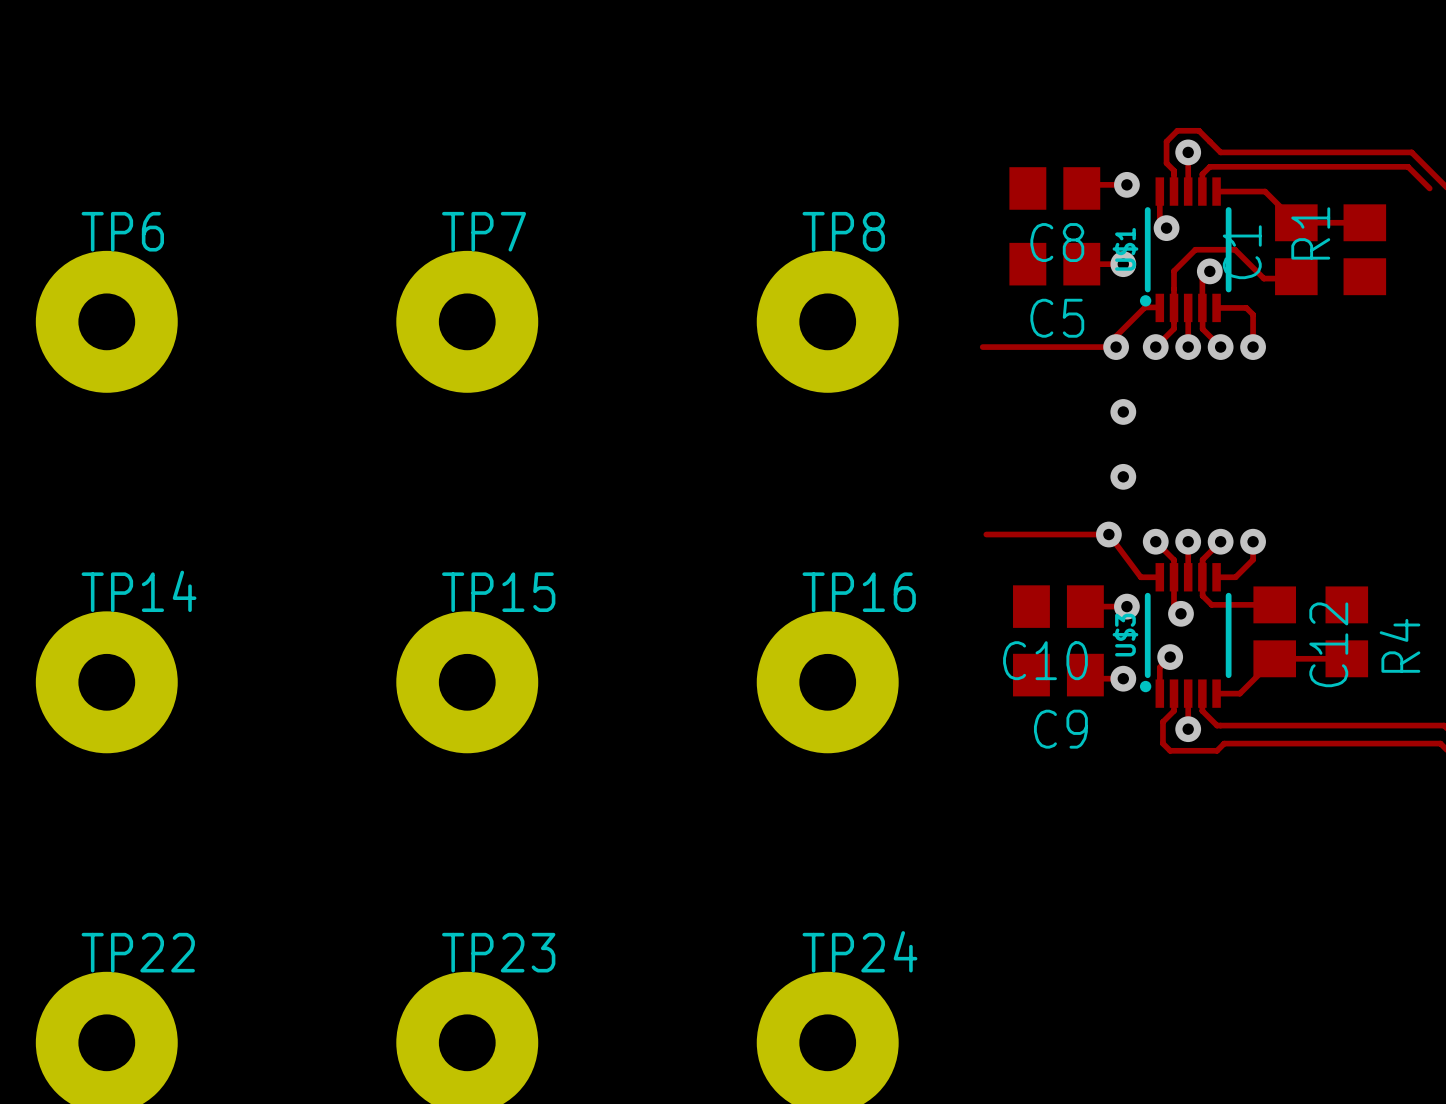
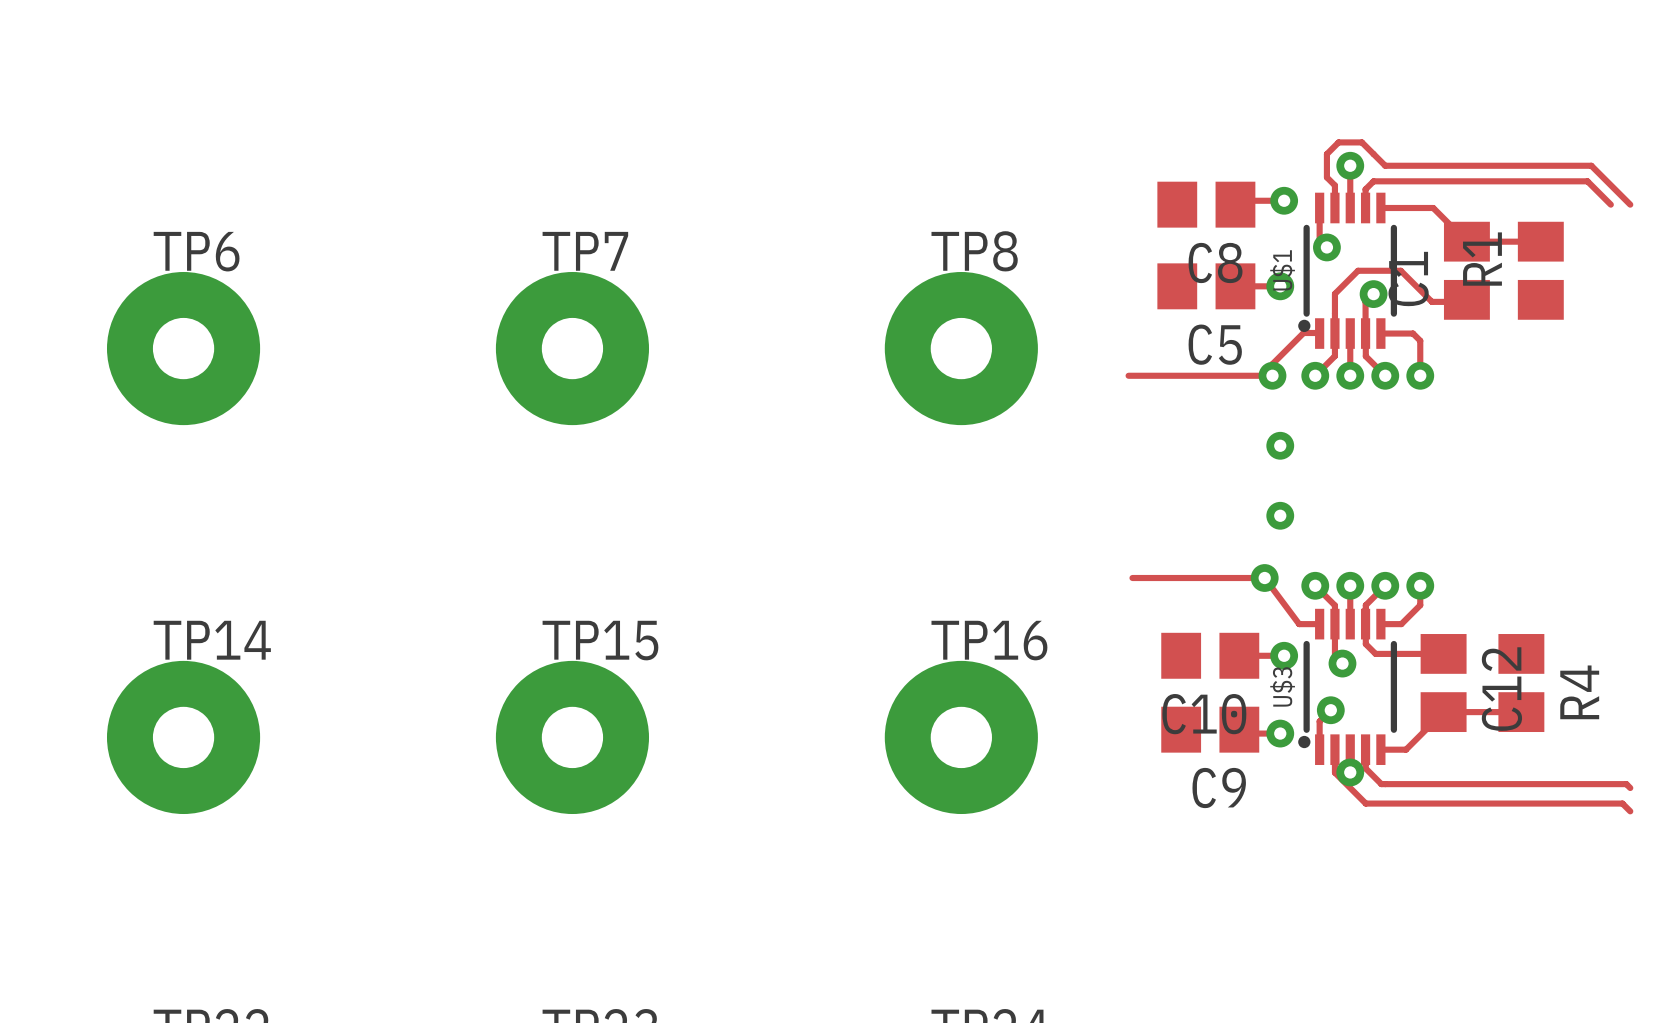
track: (1174, 710) (1162, 721) (1162, 743) (1170, 750) (1217, 750) (1224, 743) -> (1334, 768) (1334, 772) (1365, 803) (1389, 803)
via position: (1188, 729) -> (1350, 772)

